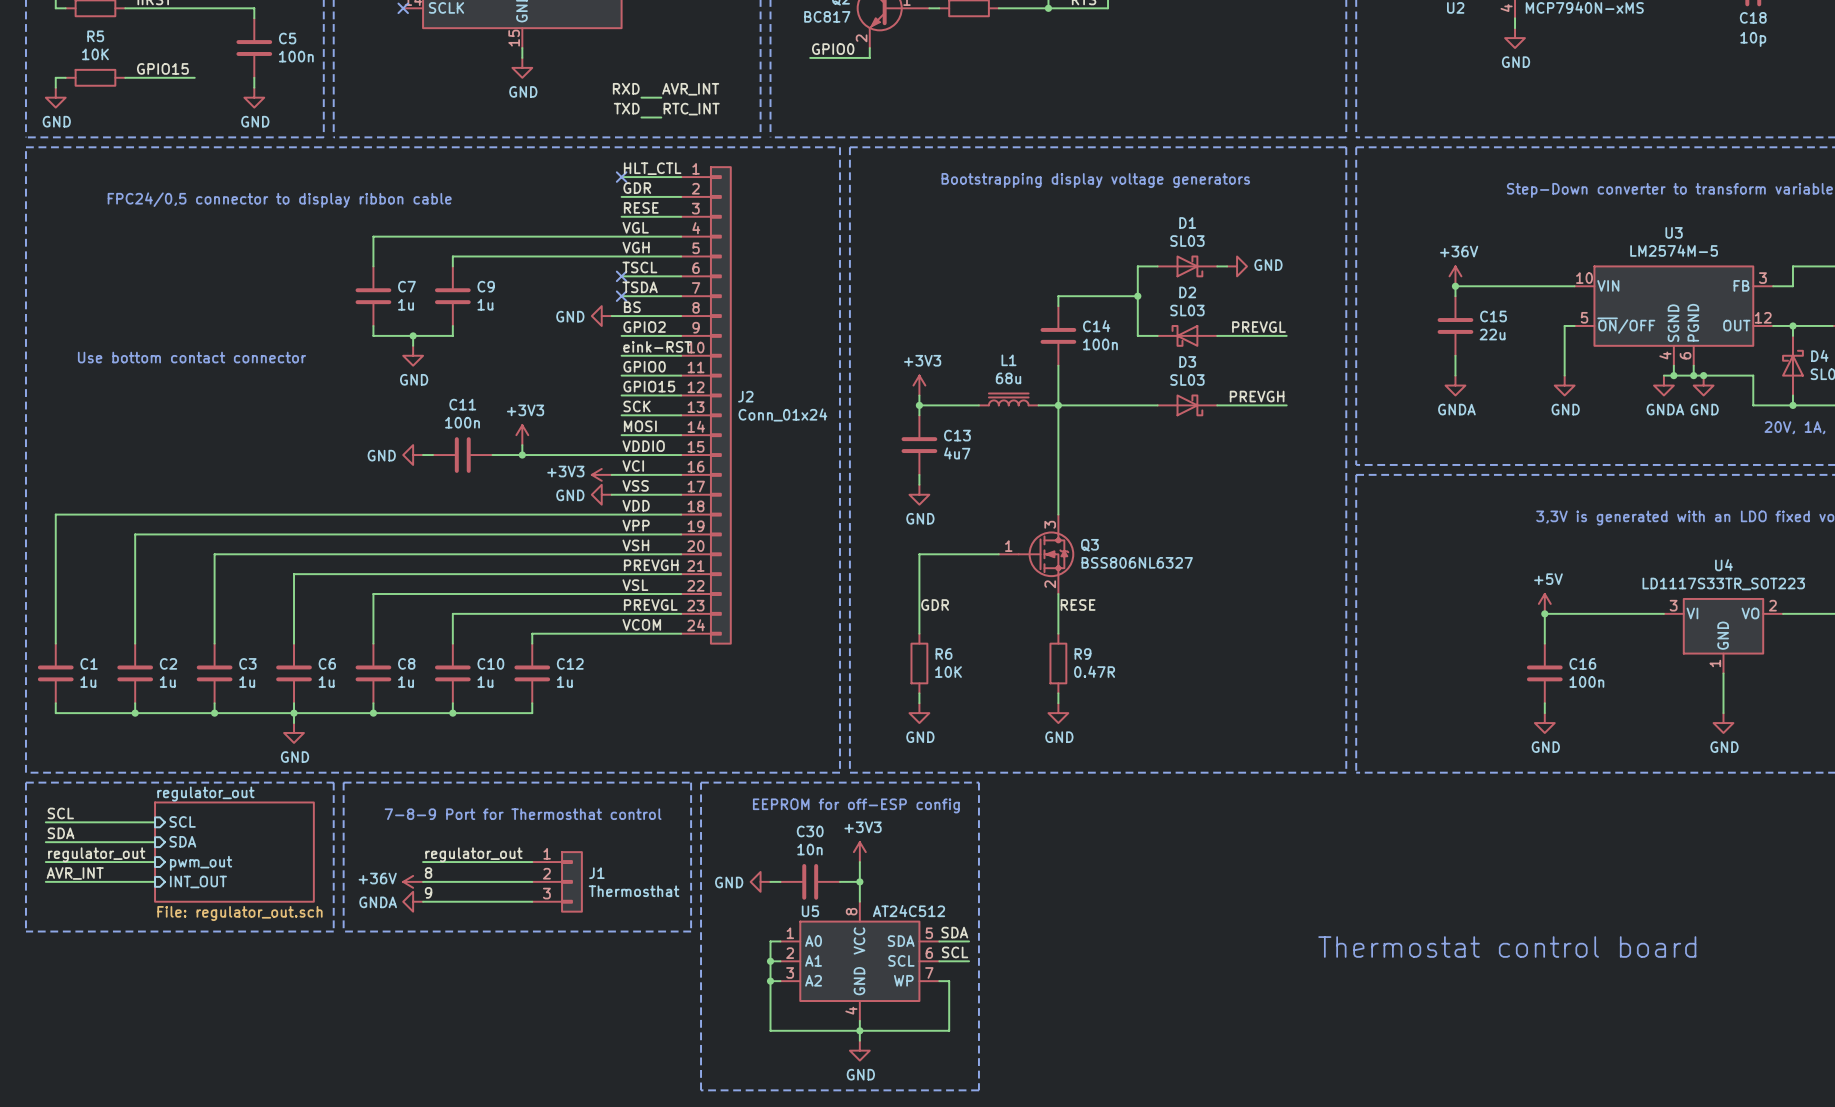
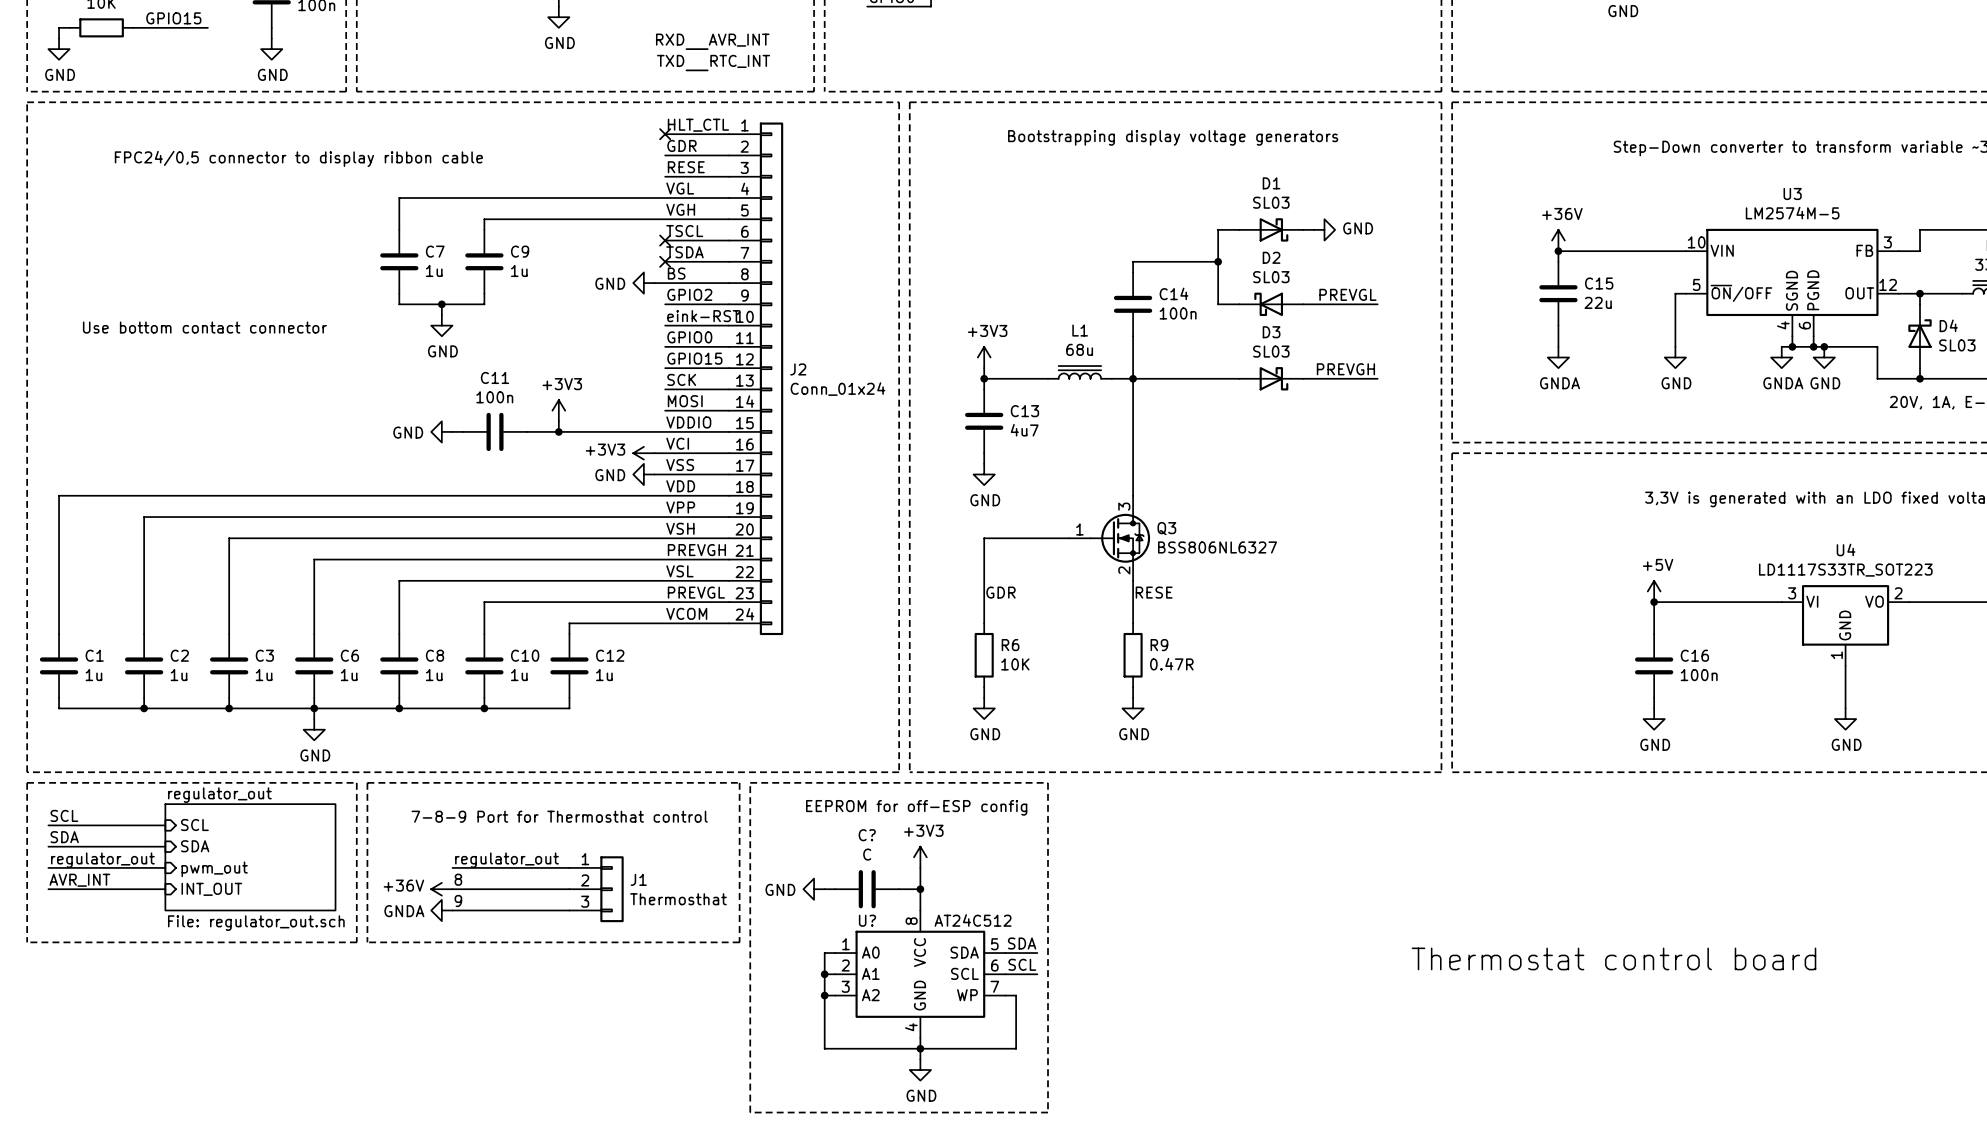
C30 name: C30 (810, 831) -> C? (867, 835)
C30 value: 10n (809, 849) -> C (867, 854)
U5 name: U5 (810, 911) -> U? (867, 920)

